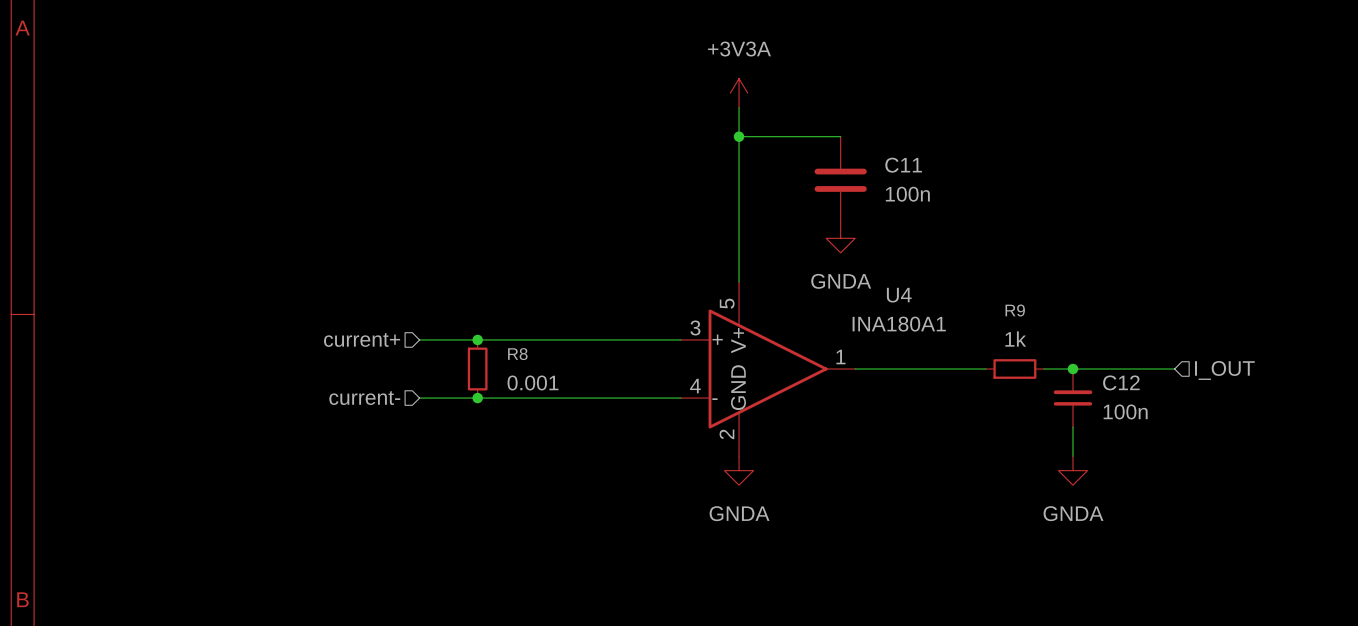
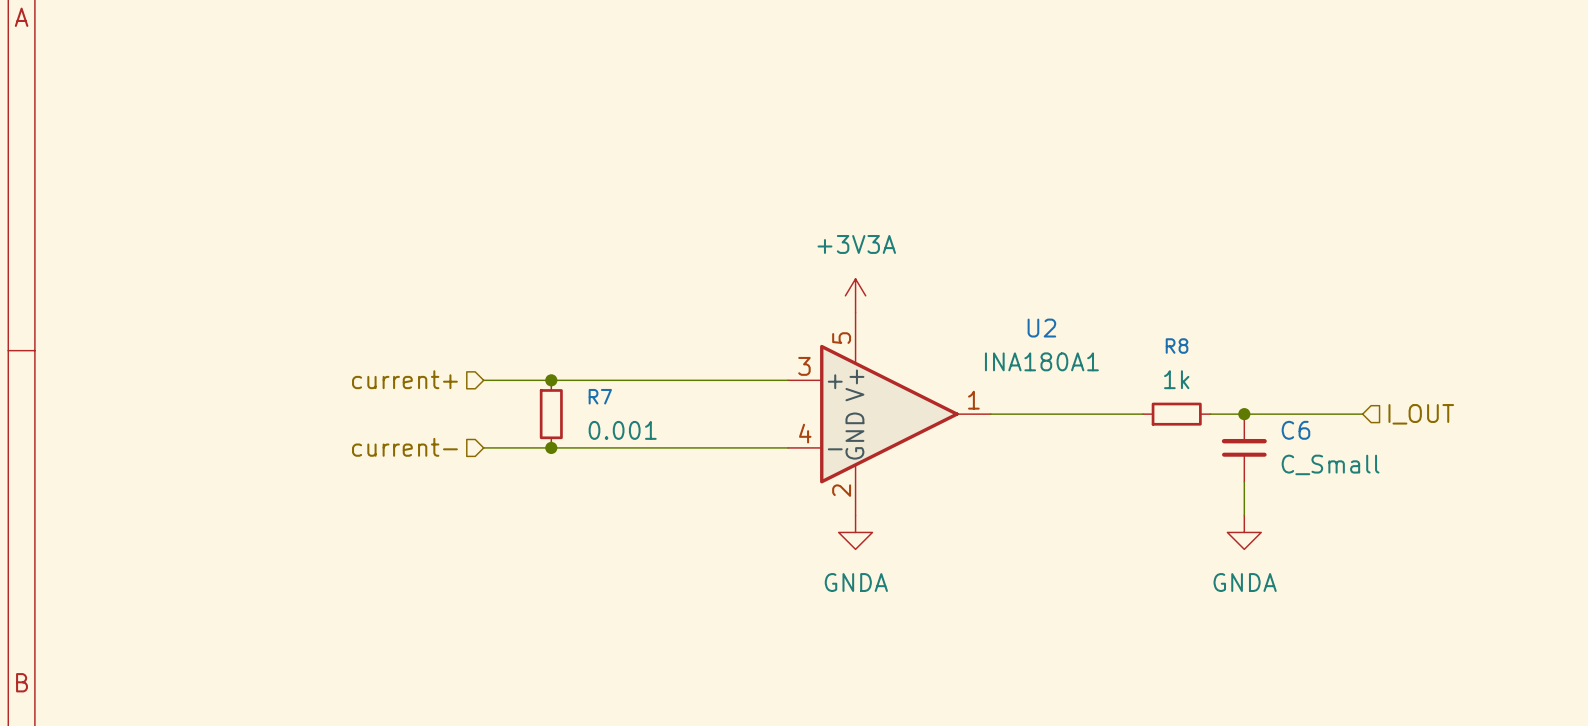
power symbol position: +3V3A (739, 93) -> +3V3A (855, 295)
wire: (739, 107) (739, 281) -> none
wire: (739, 136) (840, 136) -> none
junction: (739, 136) -> none
C11: 100n (840, 180) -> none
power symbol: GNDA (840, 238) -> none
U4 name: U4 (899, 295) -> U2 (1041, 328)
R9 name: R9 (1015, 310) -> R8 (1177, 346)
R8 name: R8 (517, 354) -> R7 (600, 396)
C12 name: C12 (1121, 382) -> C6 (1295, 430)
C12 value: 100n (1125, 411) -> C_Small (1330, 464)

